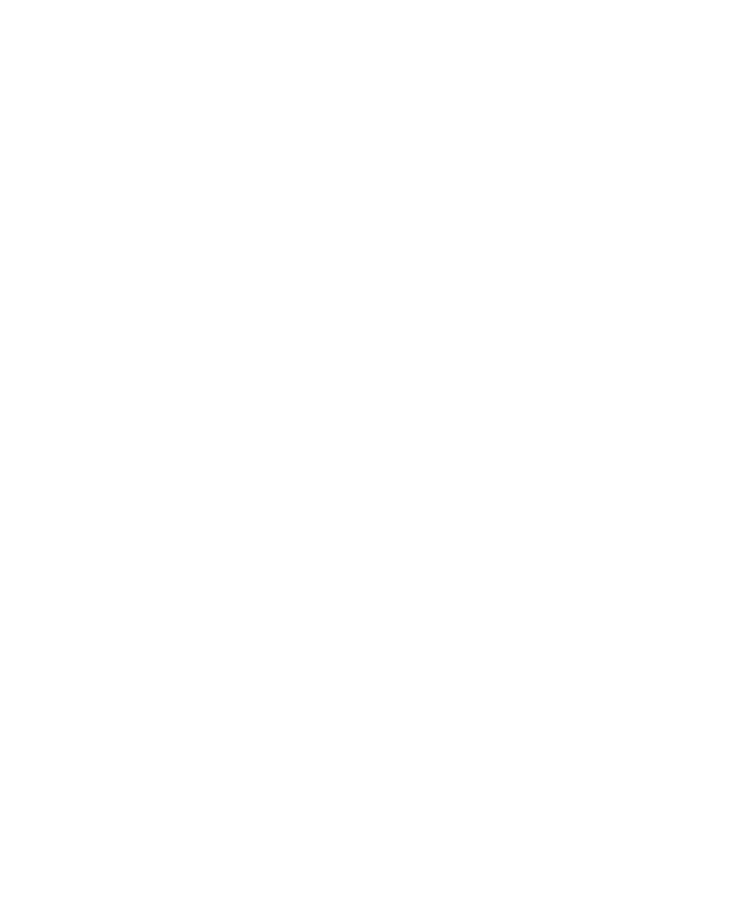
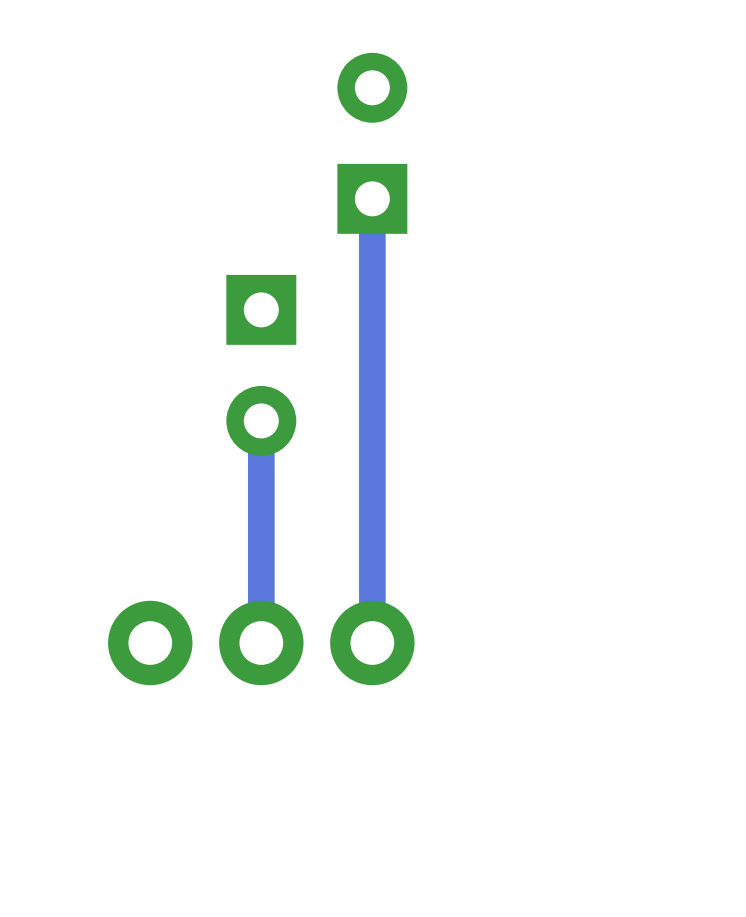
part: none -> (372, 143)
track: none -> (372, 198) (372, 643)
part: none -> (261, 365)
track: none -> (261, 420) (261, 643)
part: none -> (261, 643)

